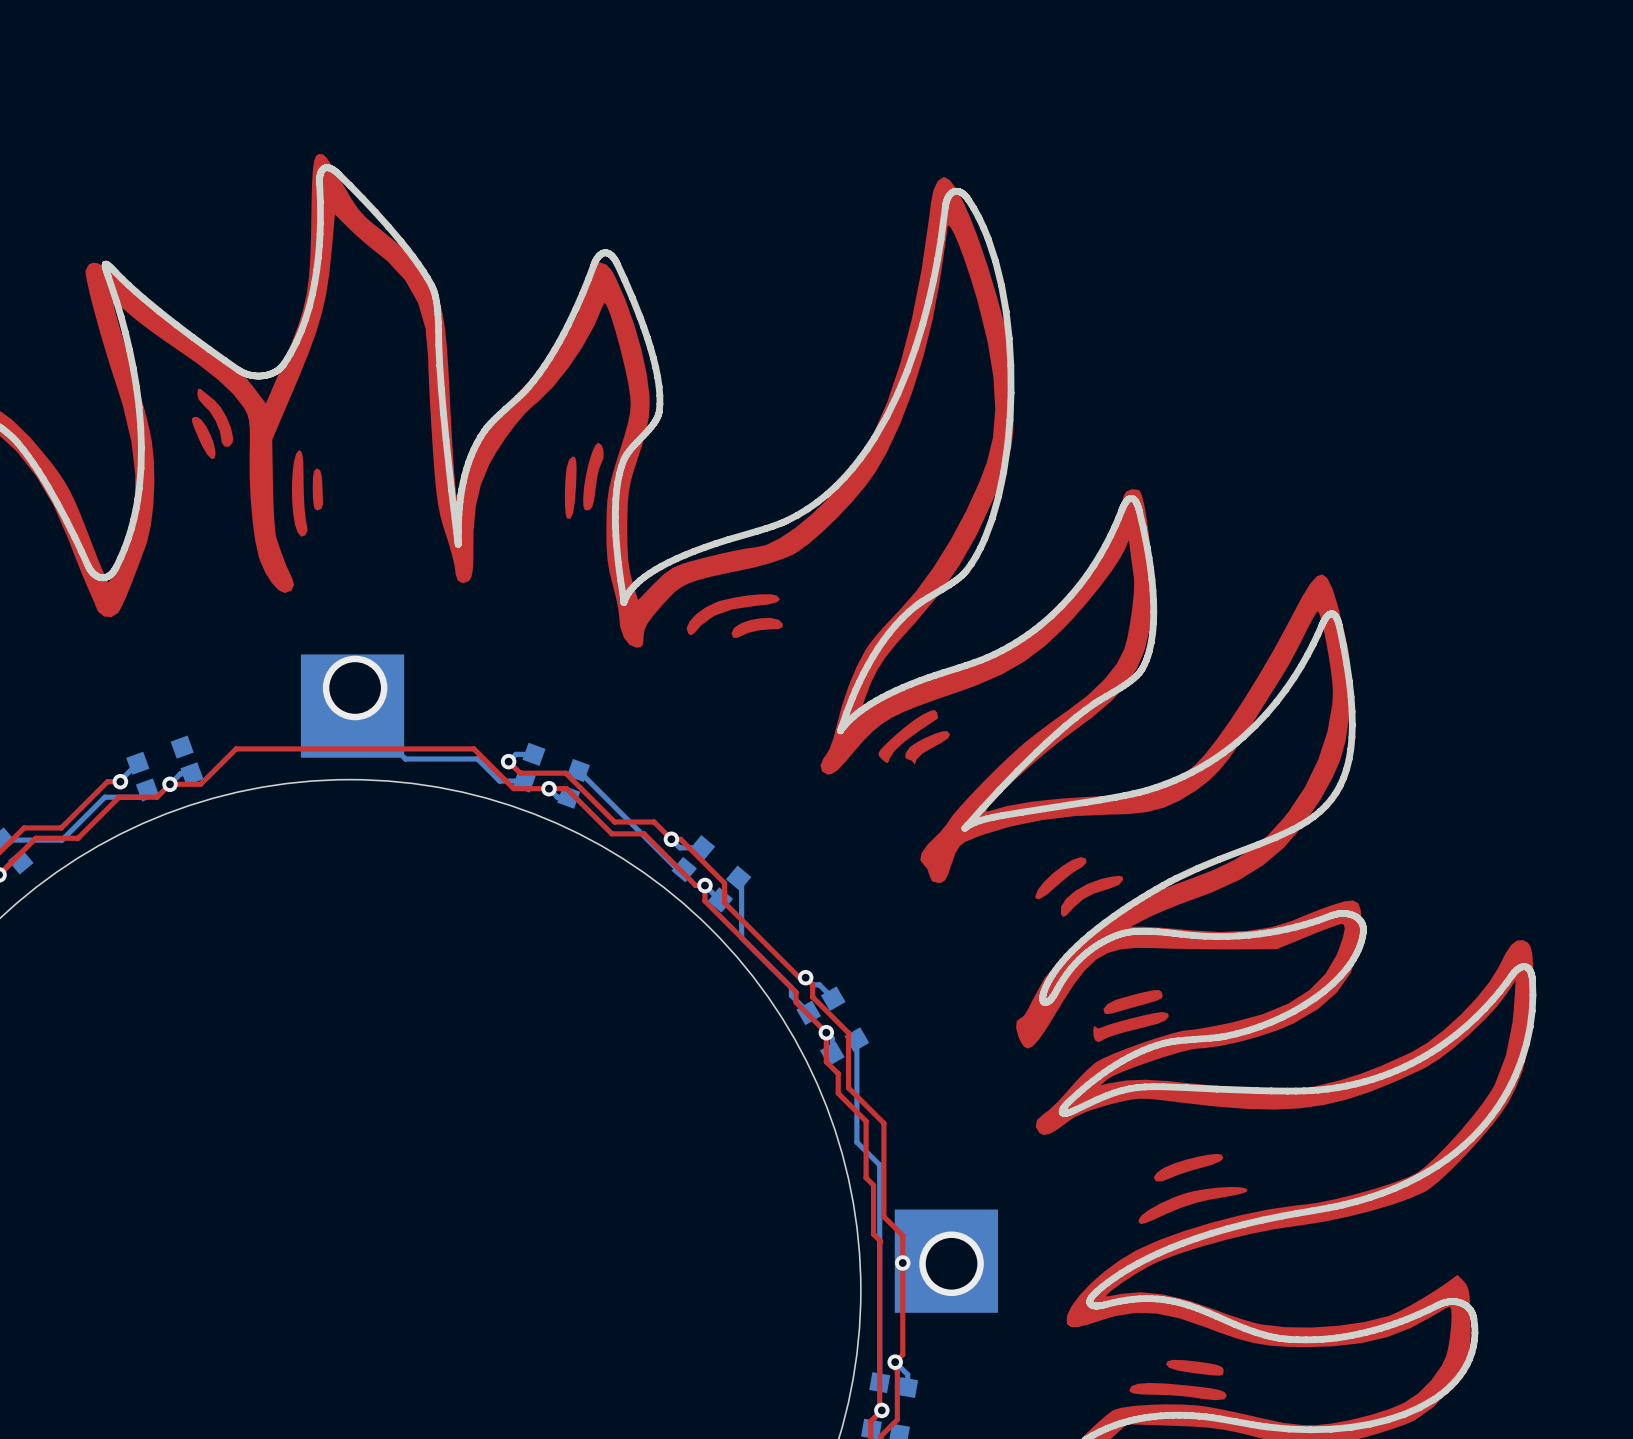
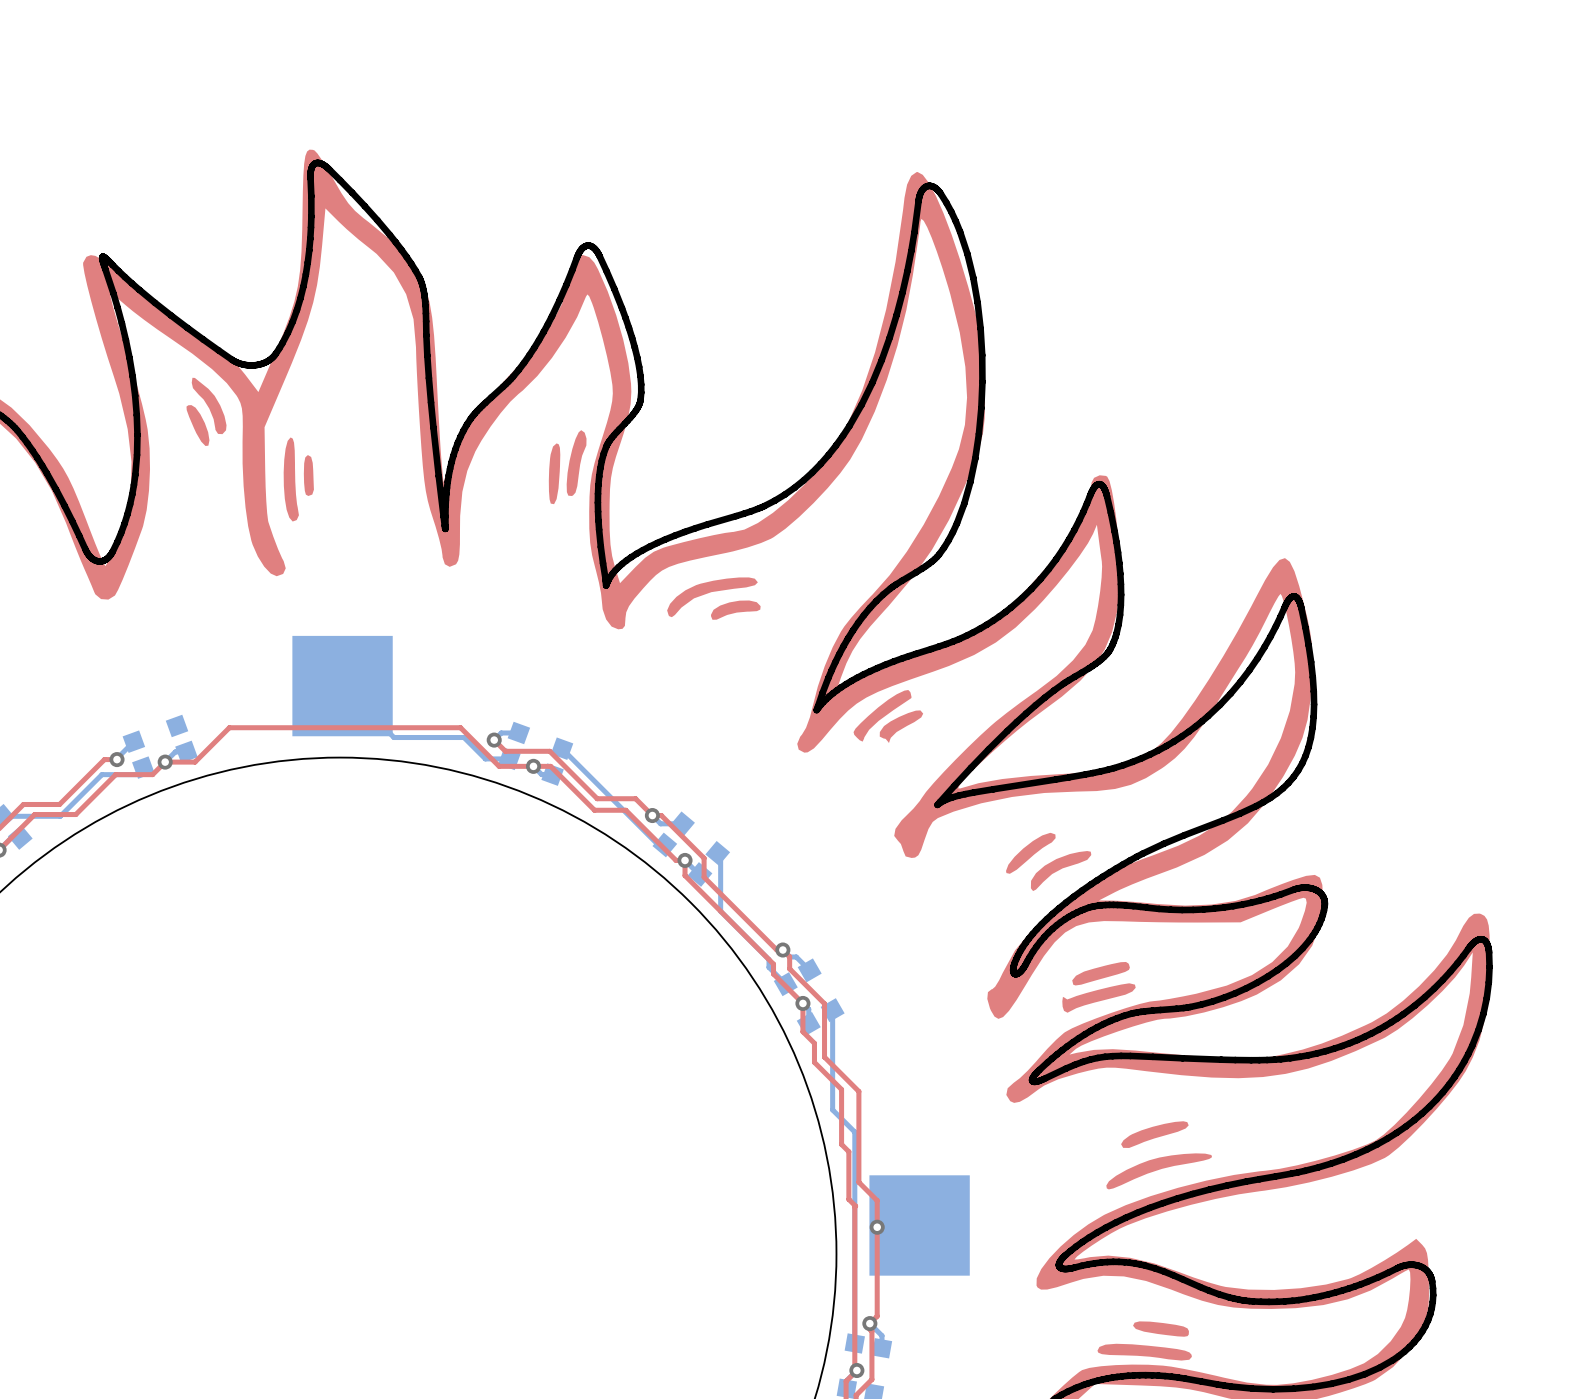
via: (355, 687) -> none
via: (951, 1263) -> none

